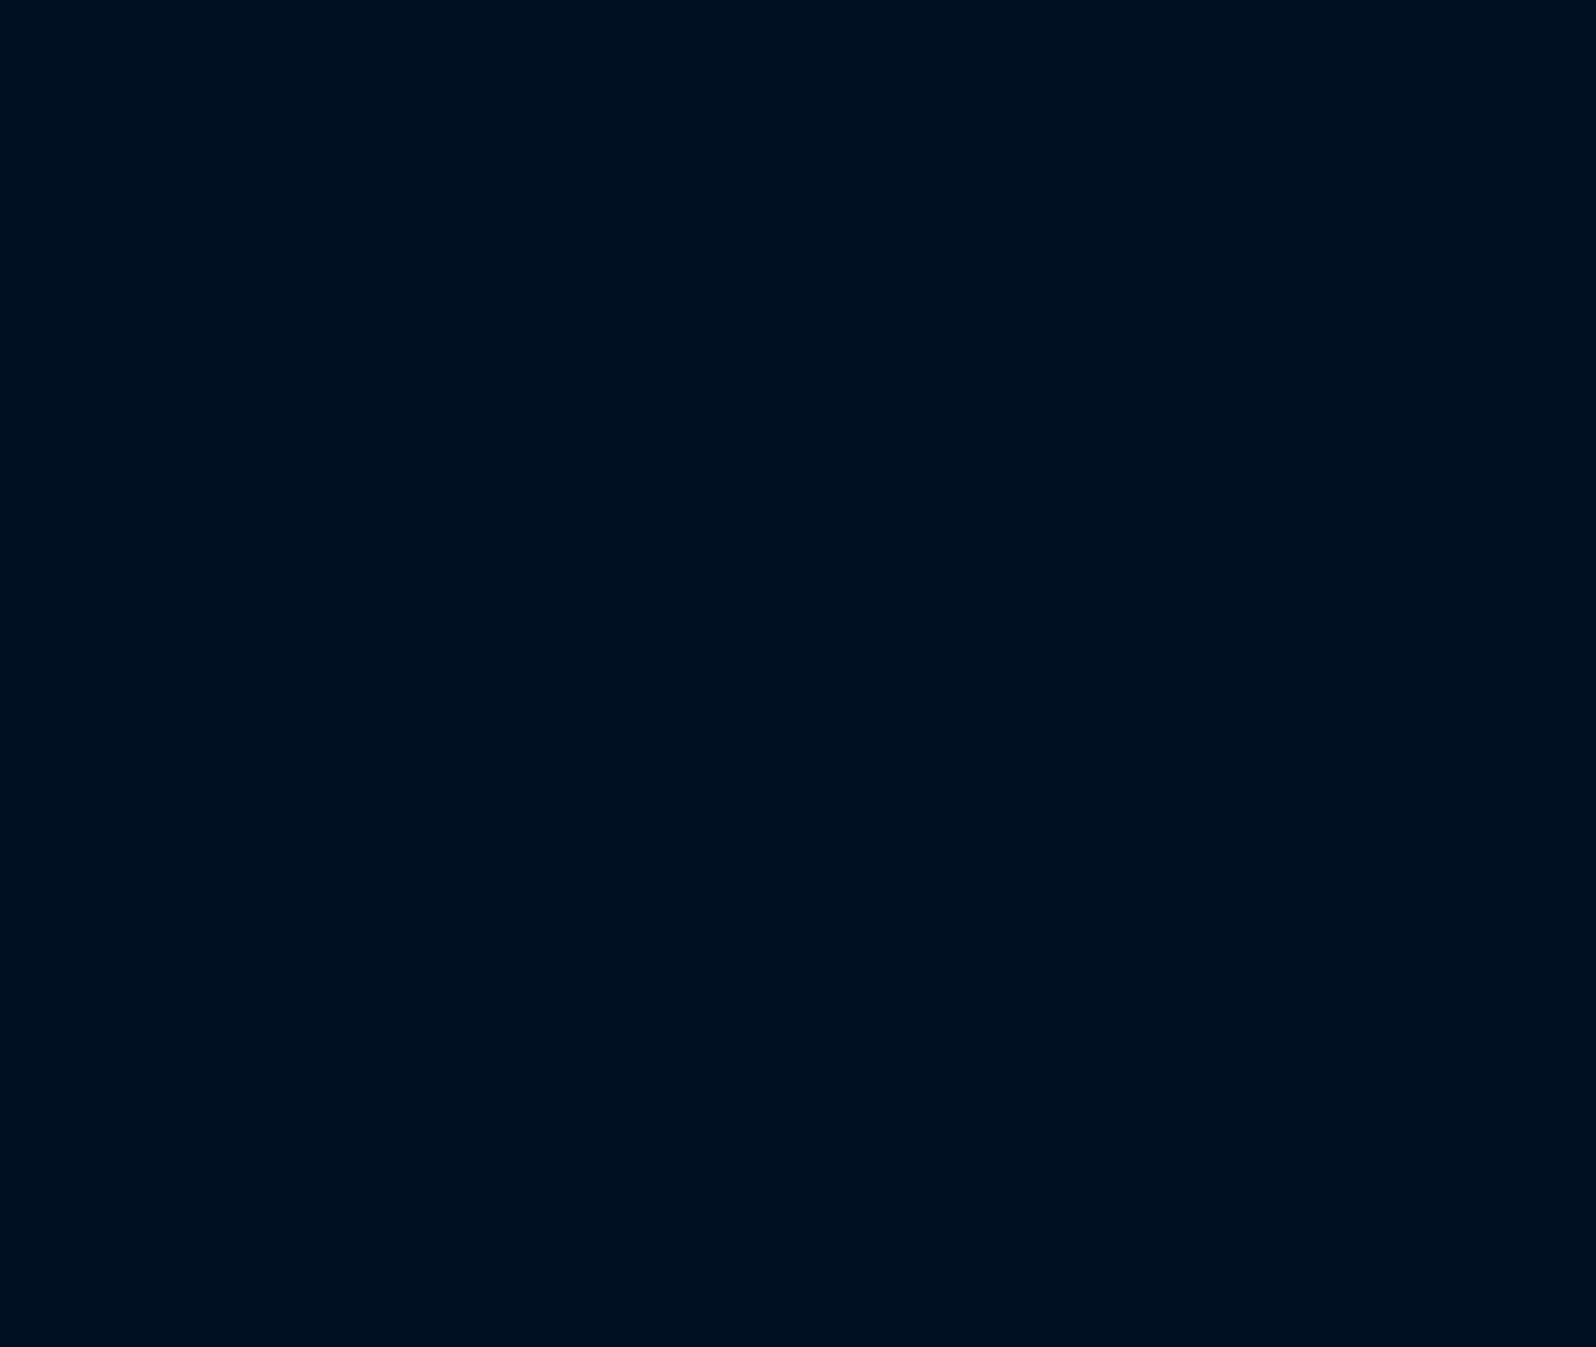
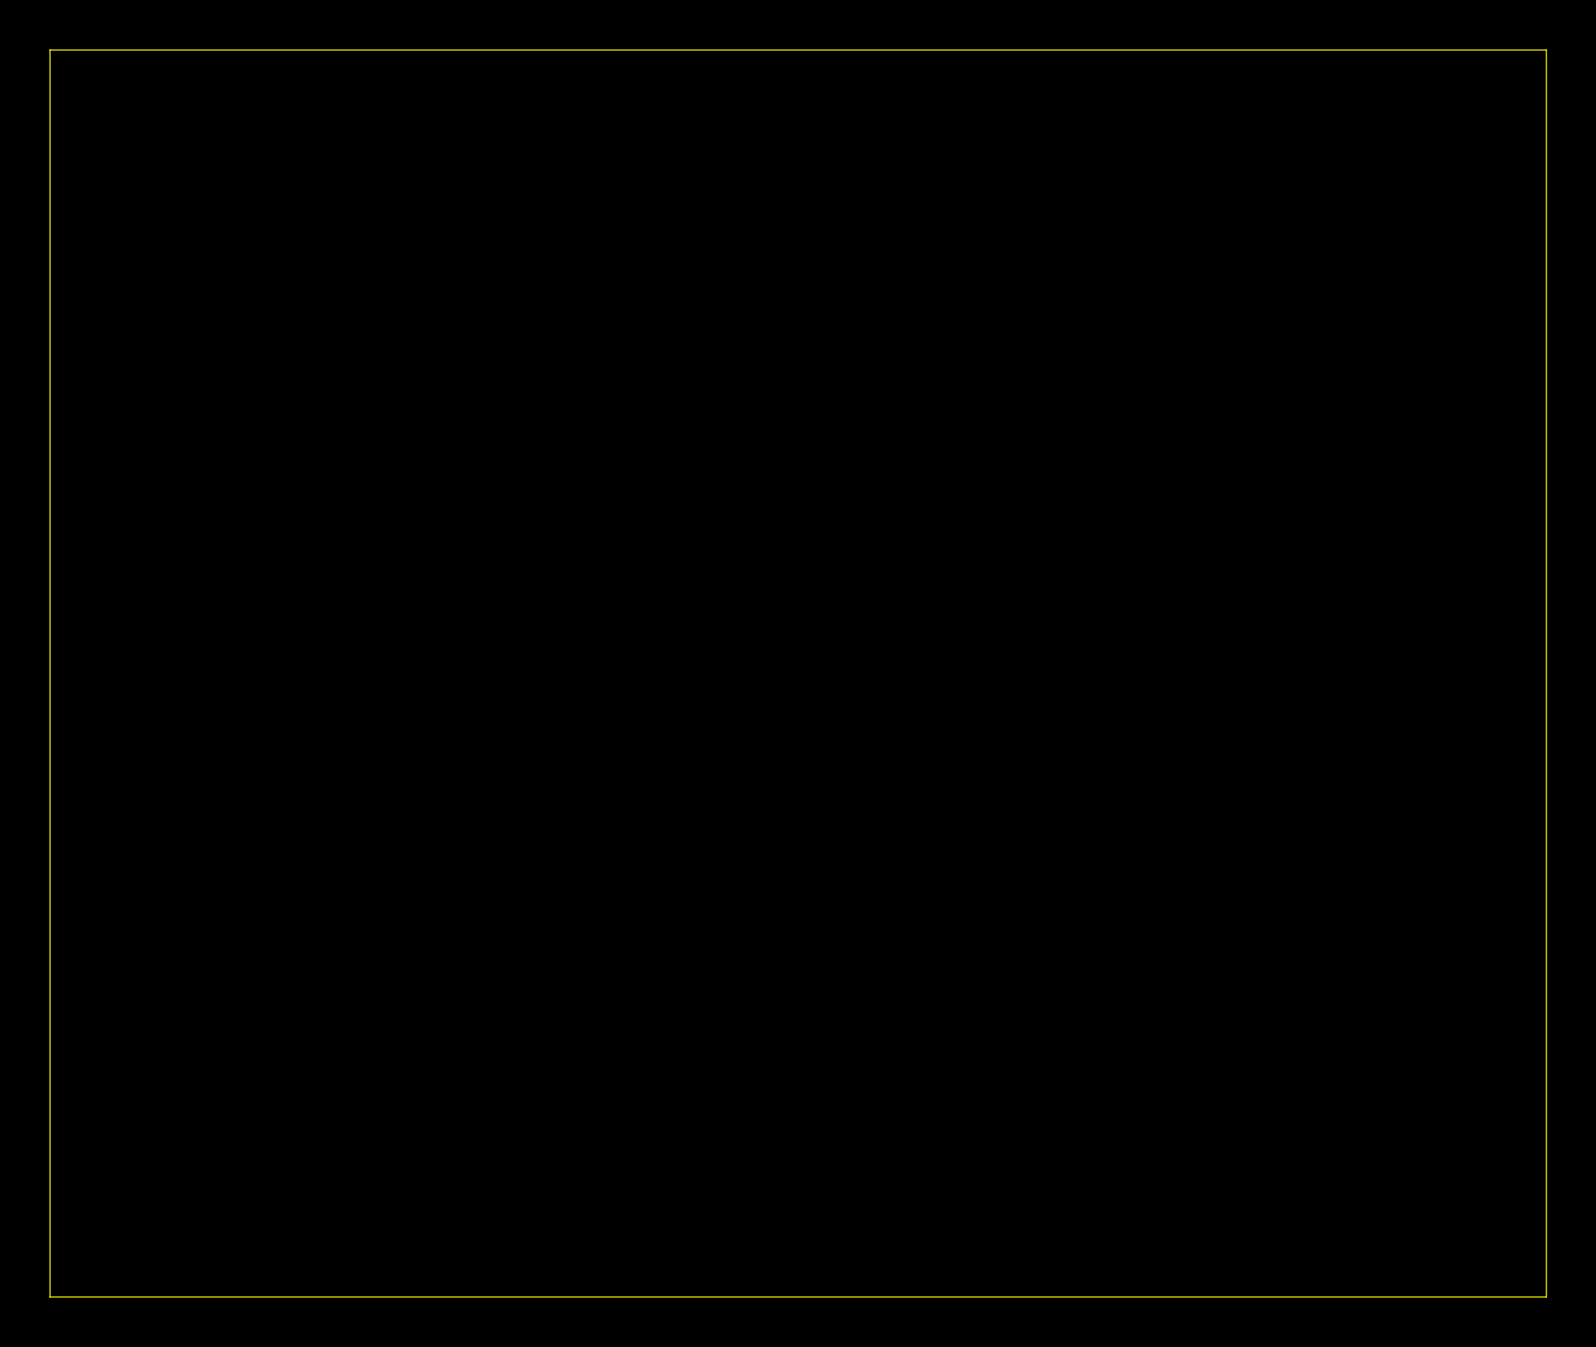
board edge: none -> (50, 50) (50, 1296) (1546, 1296) (1546, 50) (50, 50)

